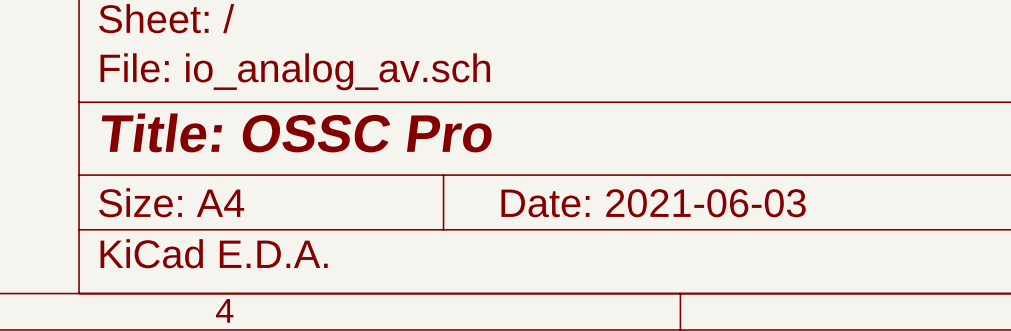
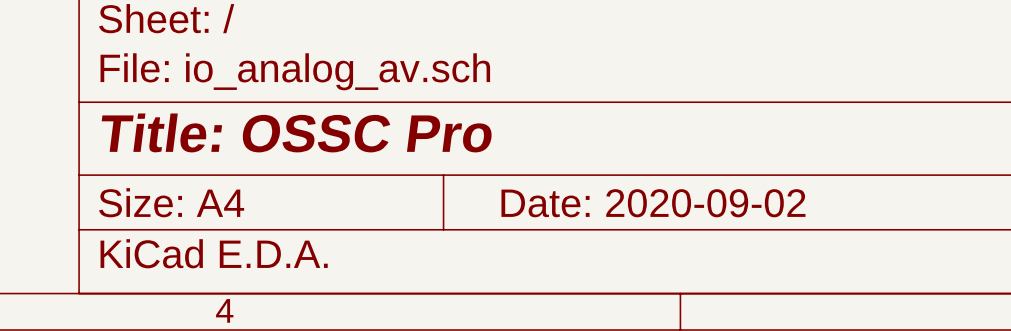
title block: Date: 2021-06-03 (653, 203) -> Date: 2020-09-02 (653, 203)

